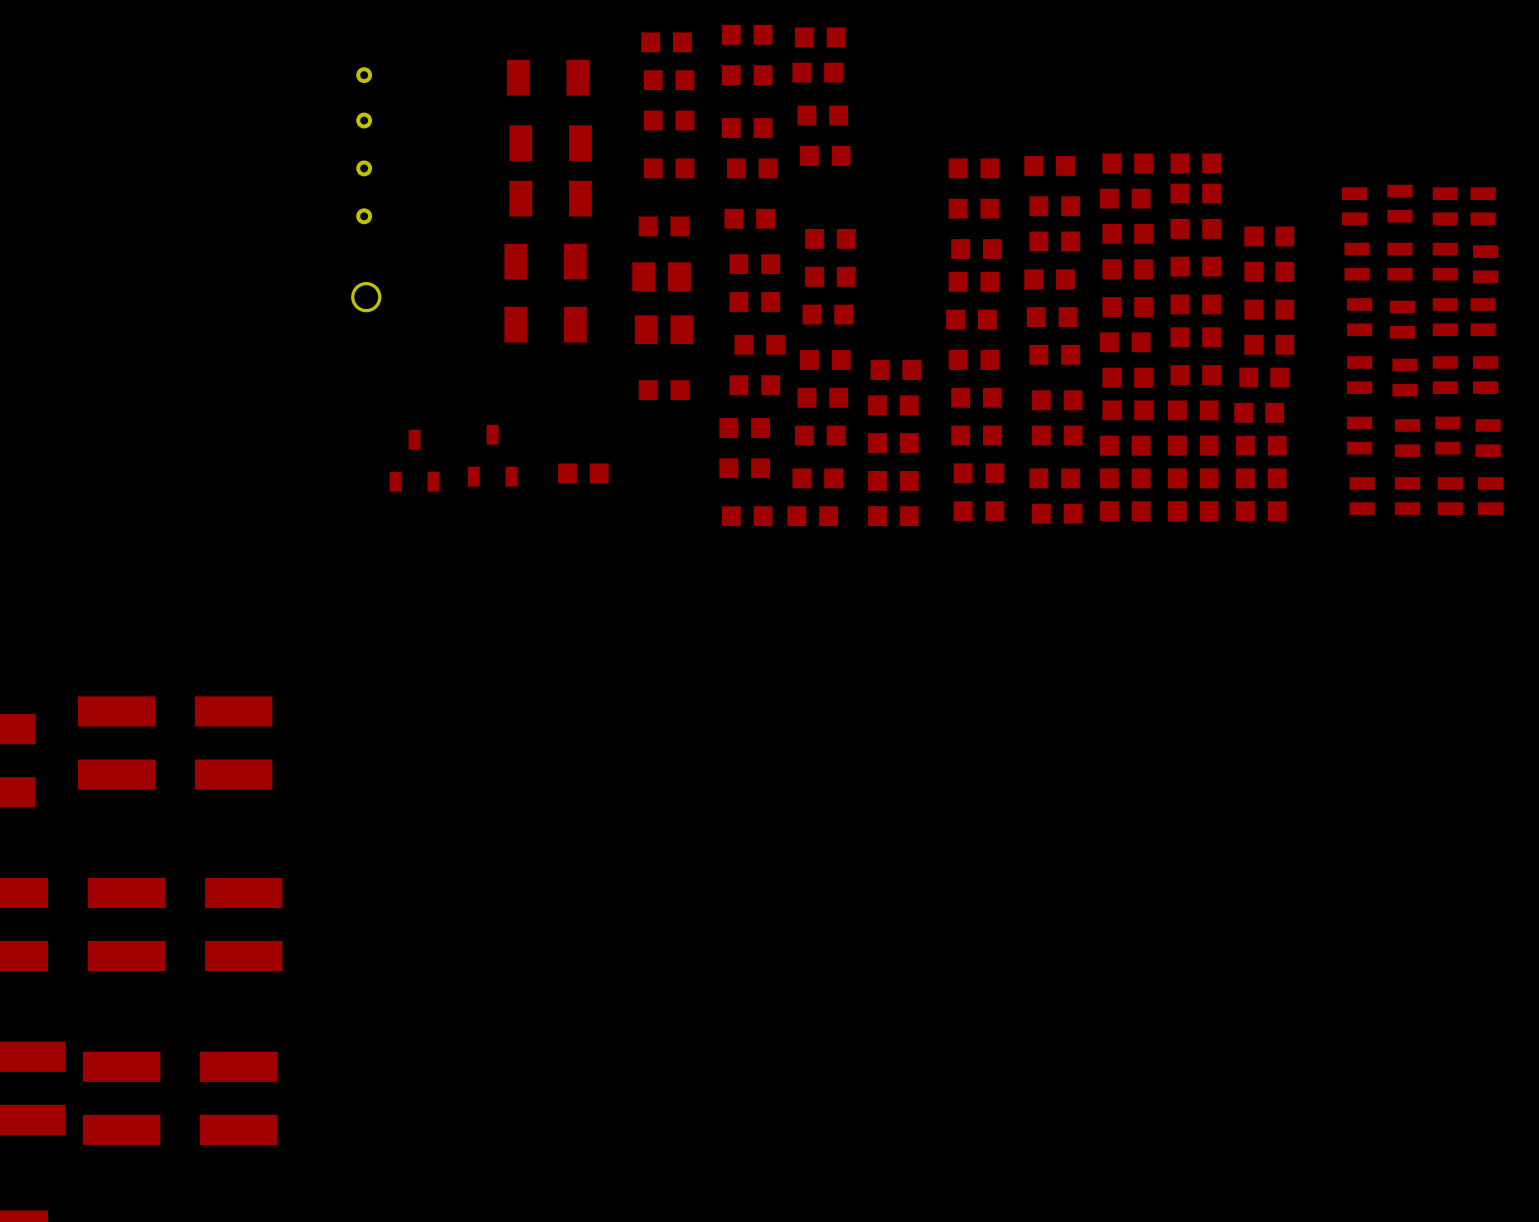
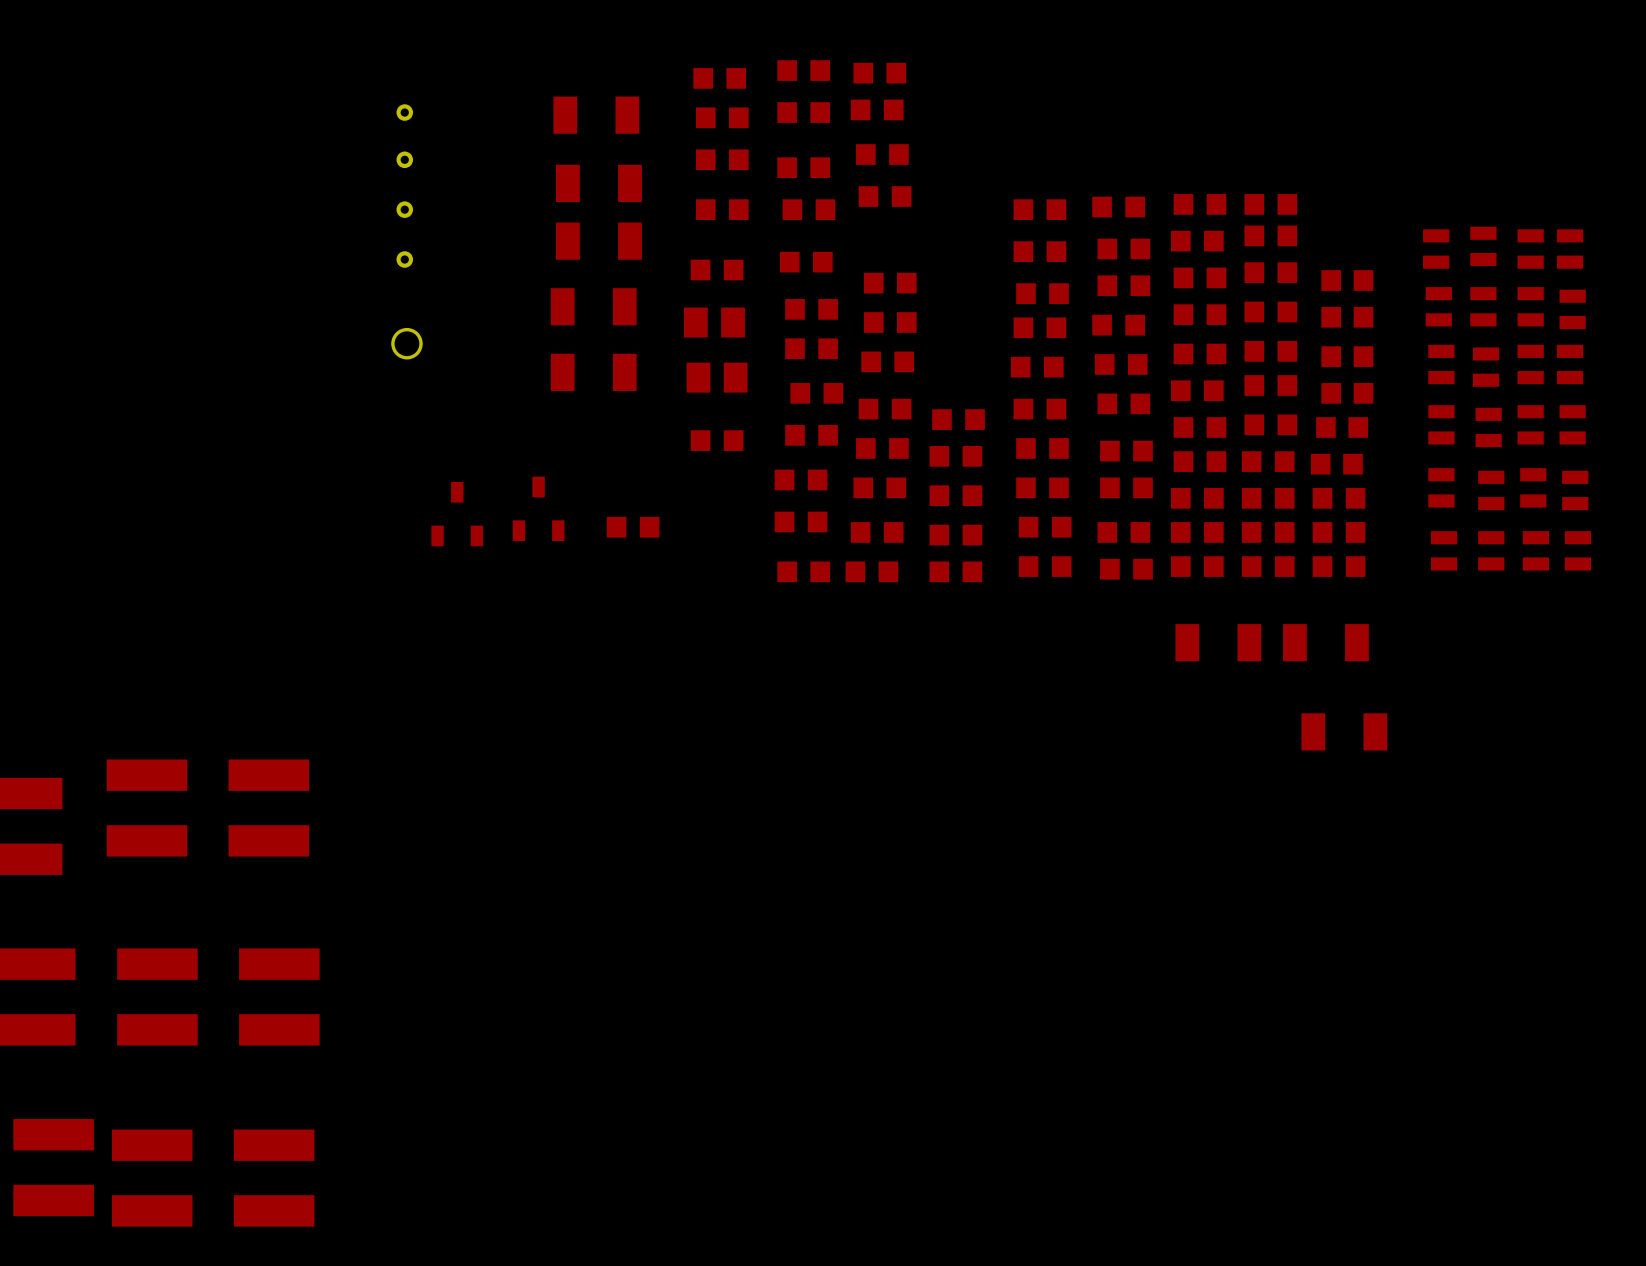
part: none -> (1218, 642)
part: none -> (1325, 642)
part: none -> (1344, 731)

